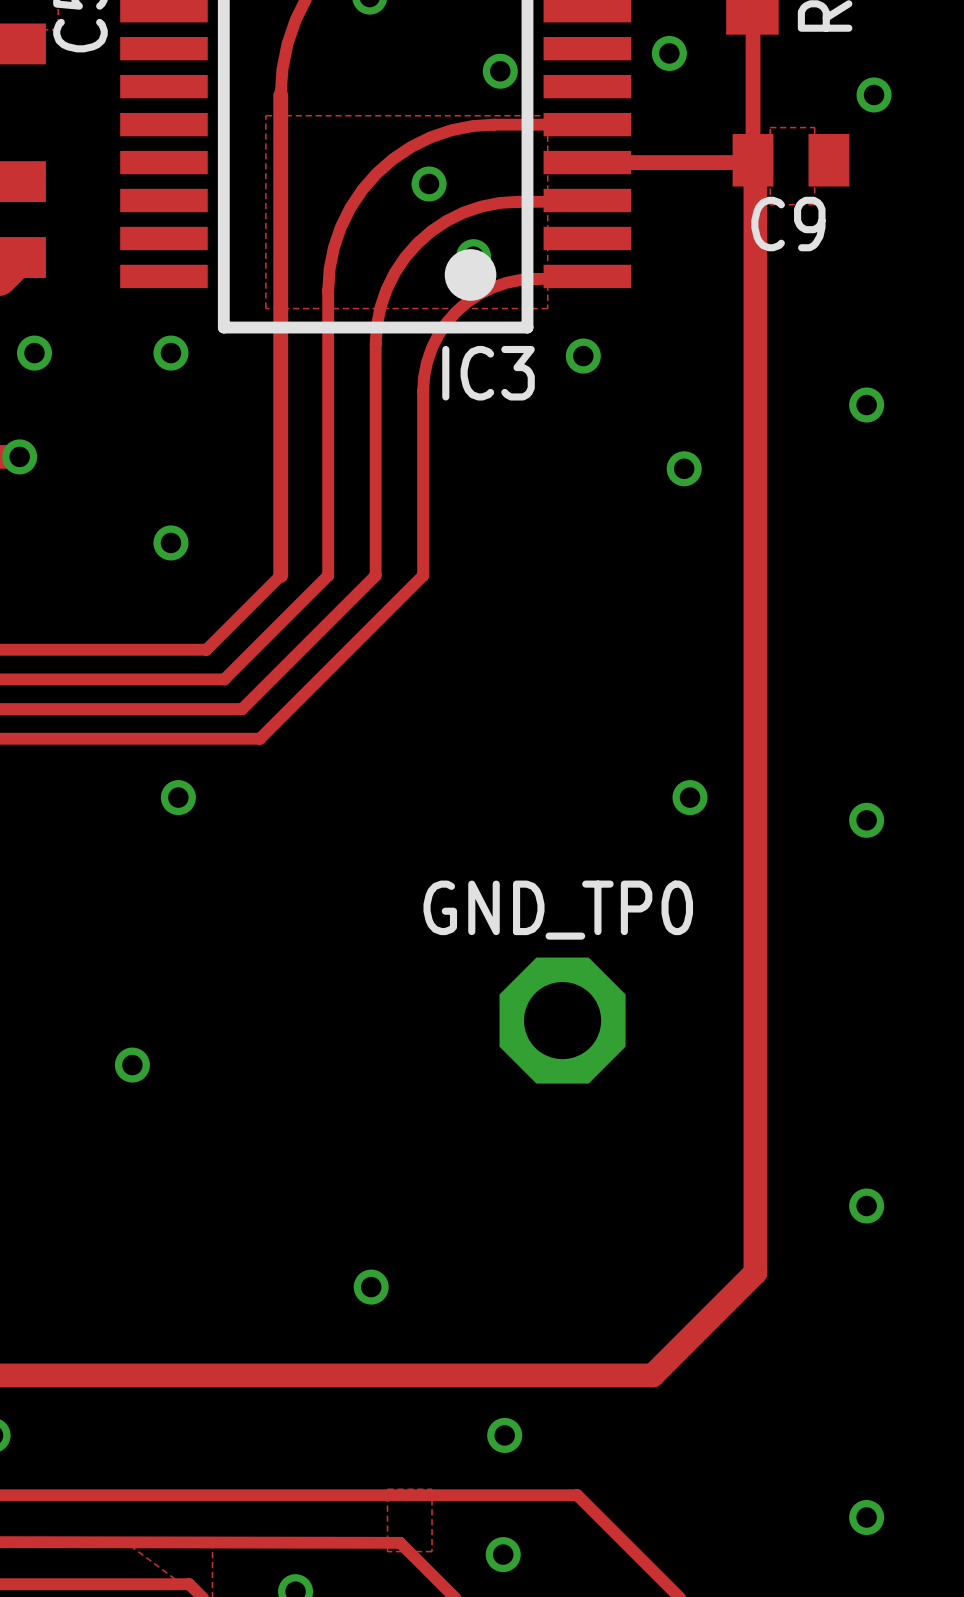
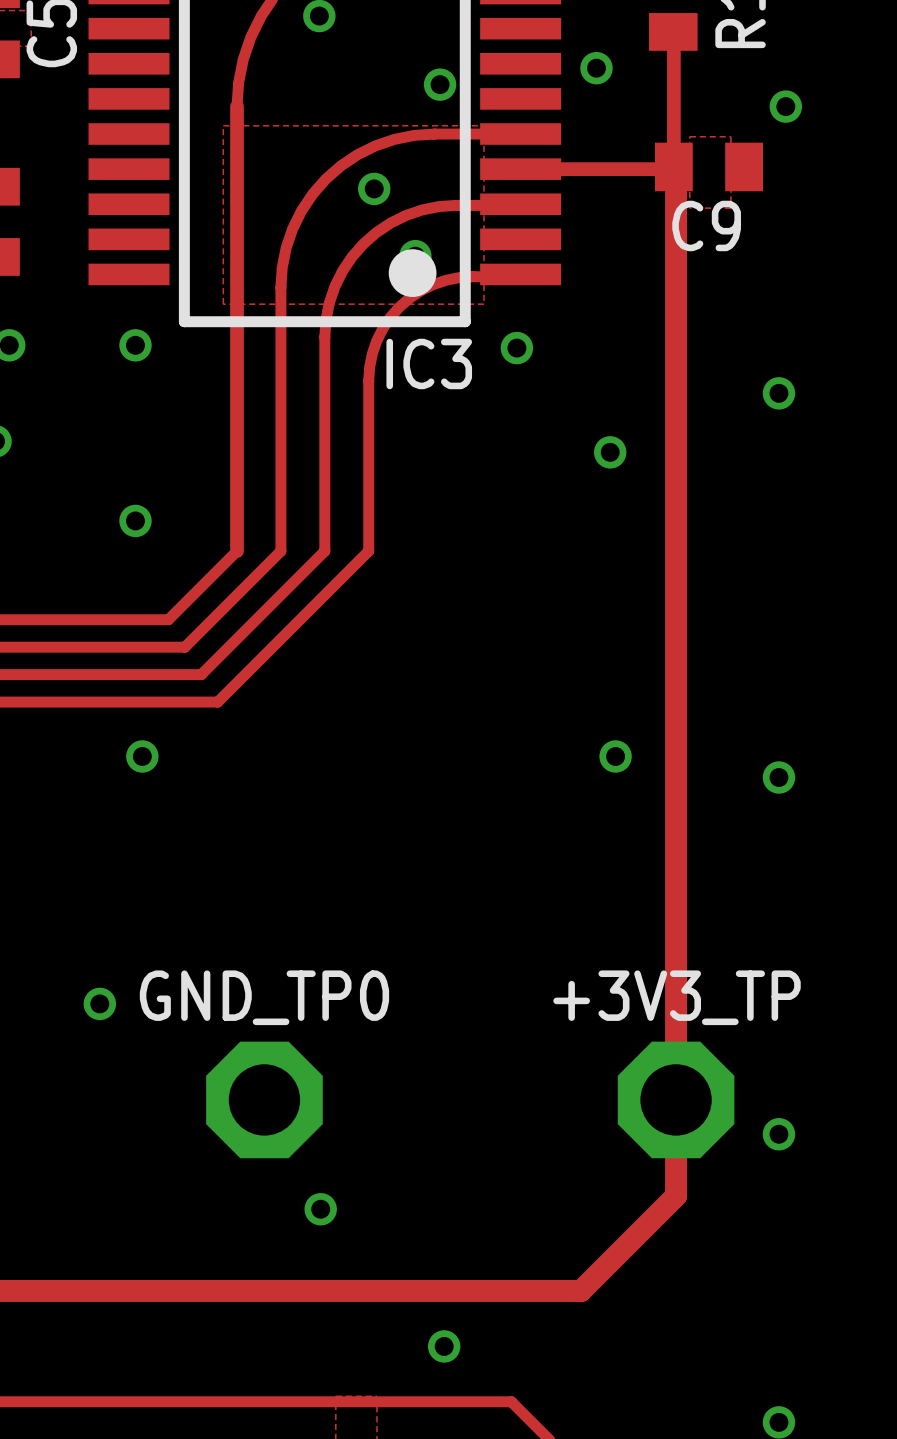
GND_TP0 name position: GND_TP0 (558, 910) -> GND_TP0 (264, 997)
GND_TP0 position: (562, 1020) -> (264, 1099)
+3V3_TP: none -> (676, 1099)

